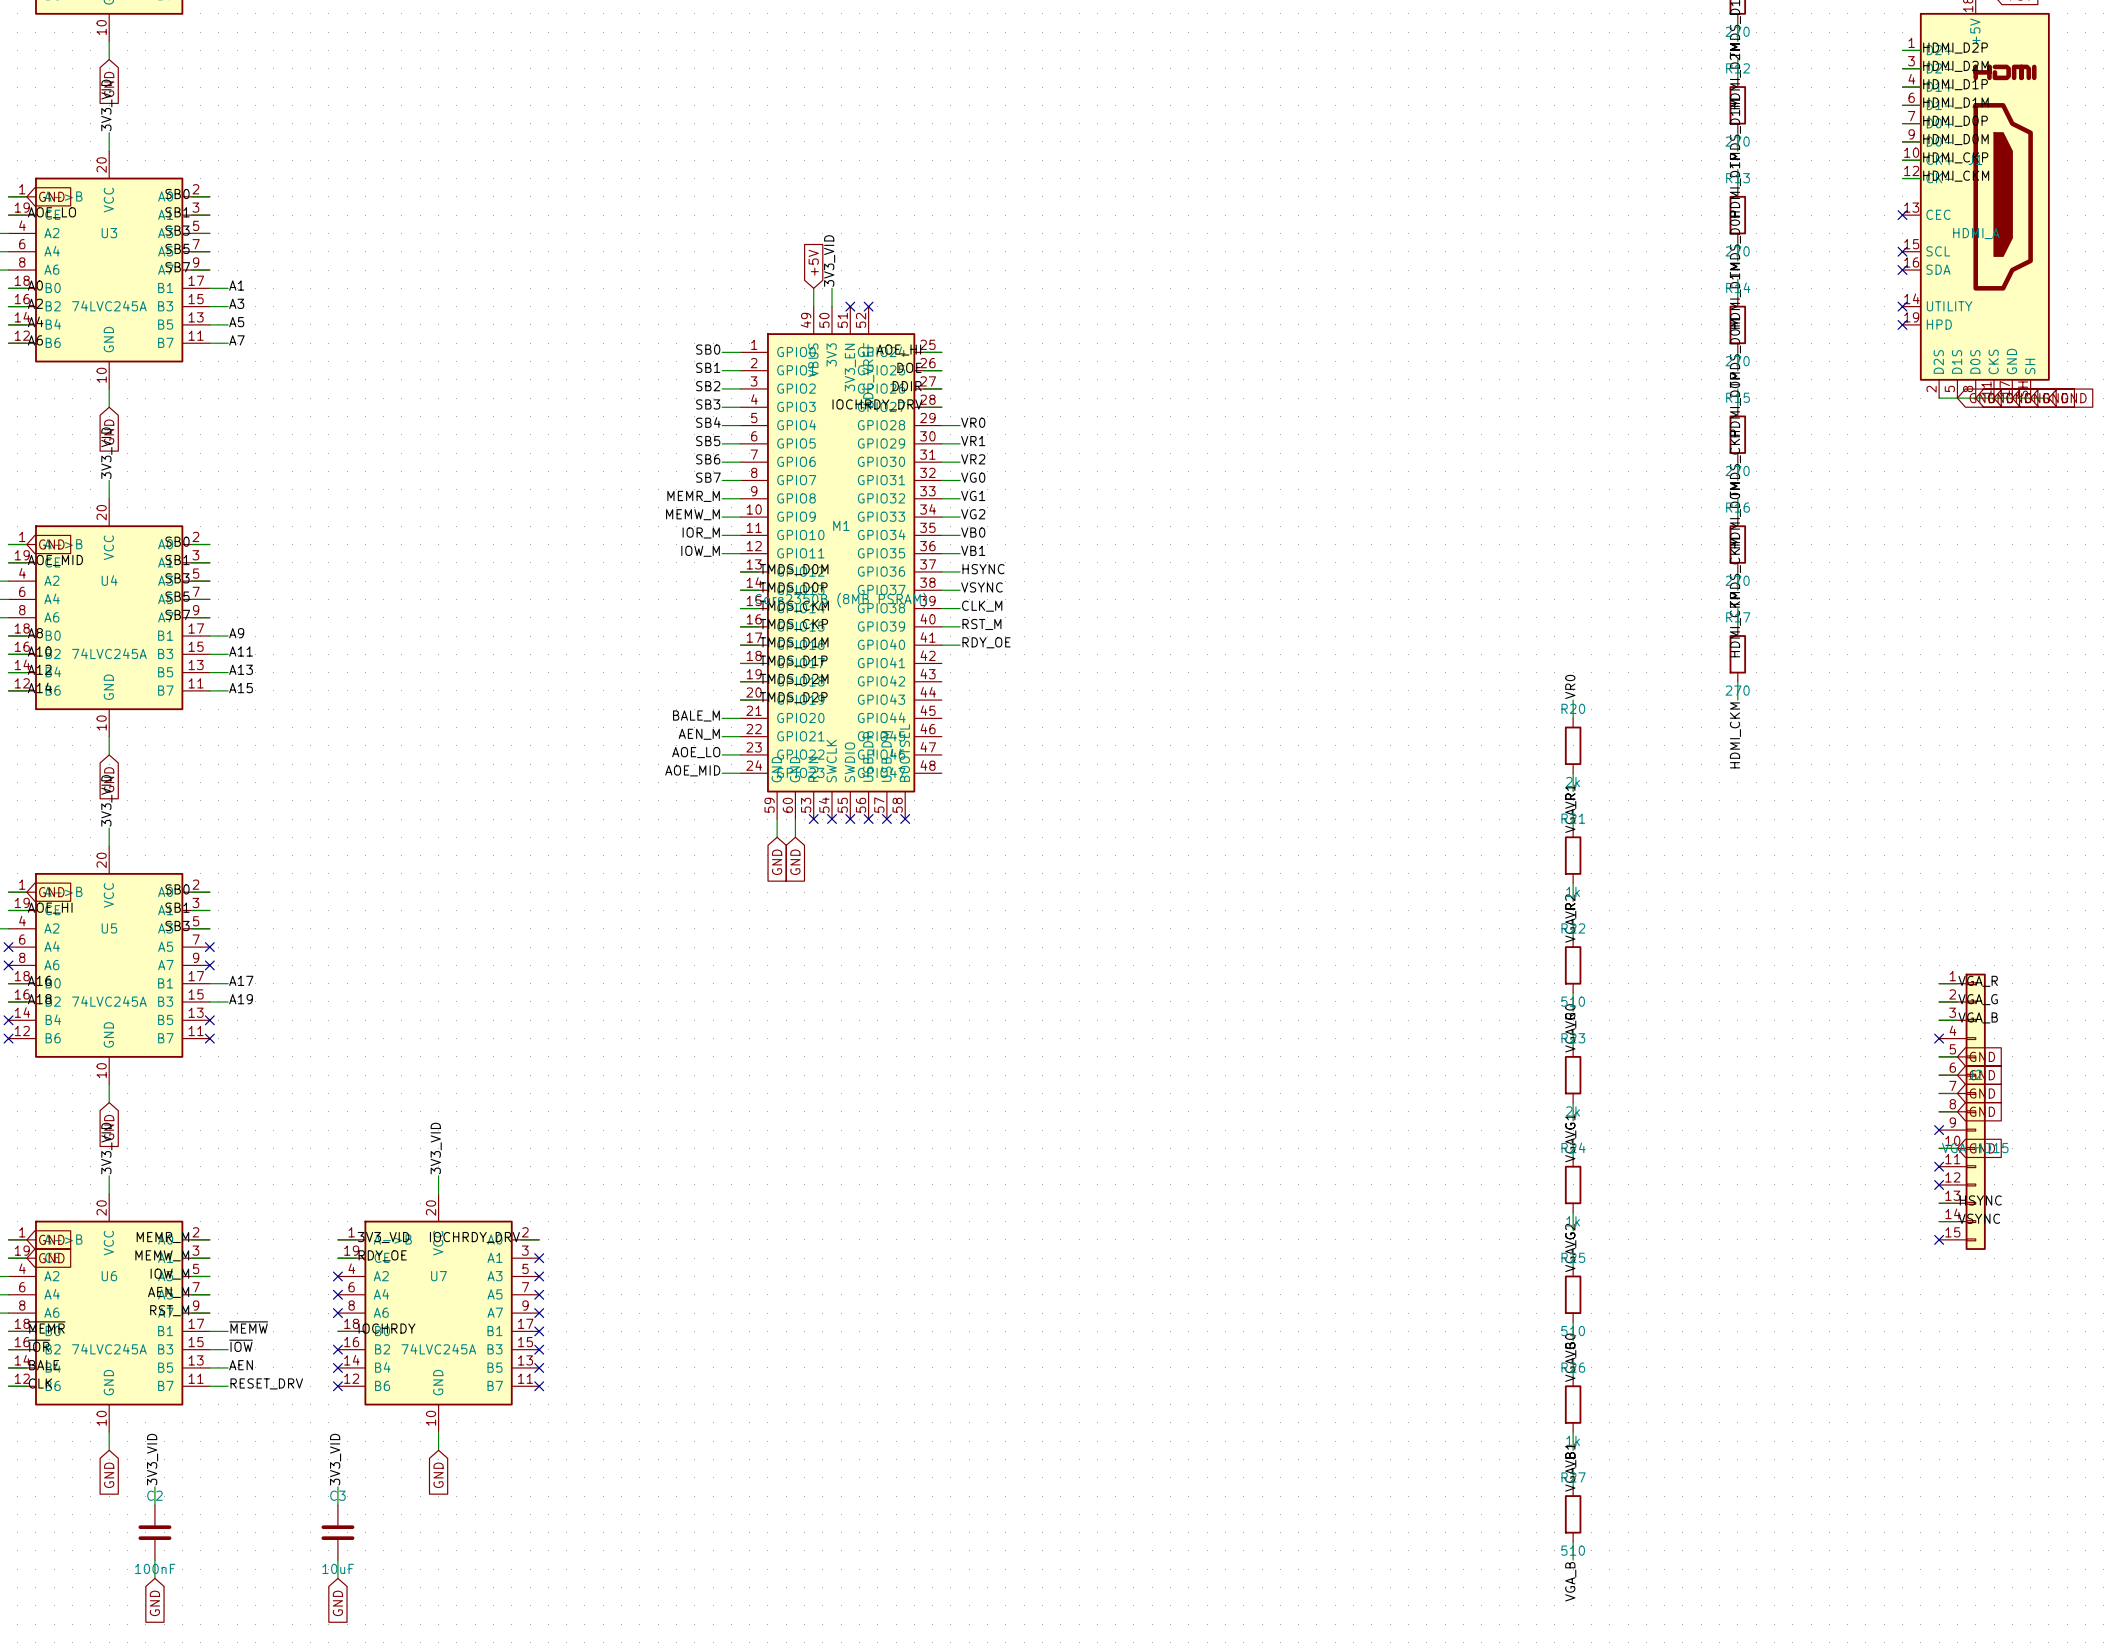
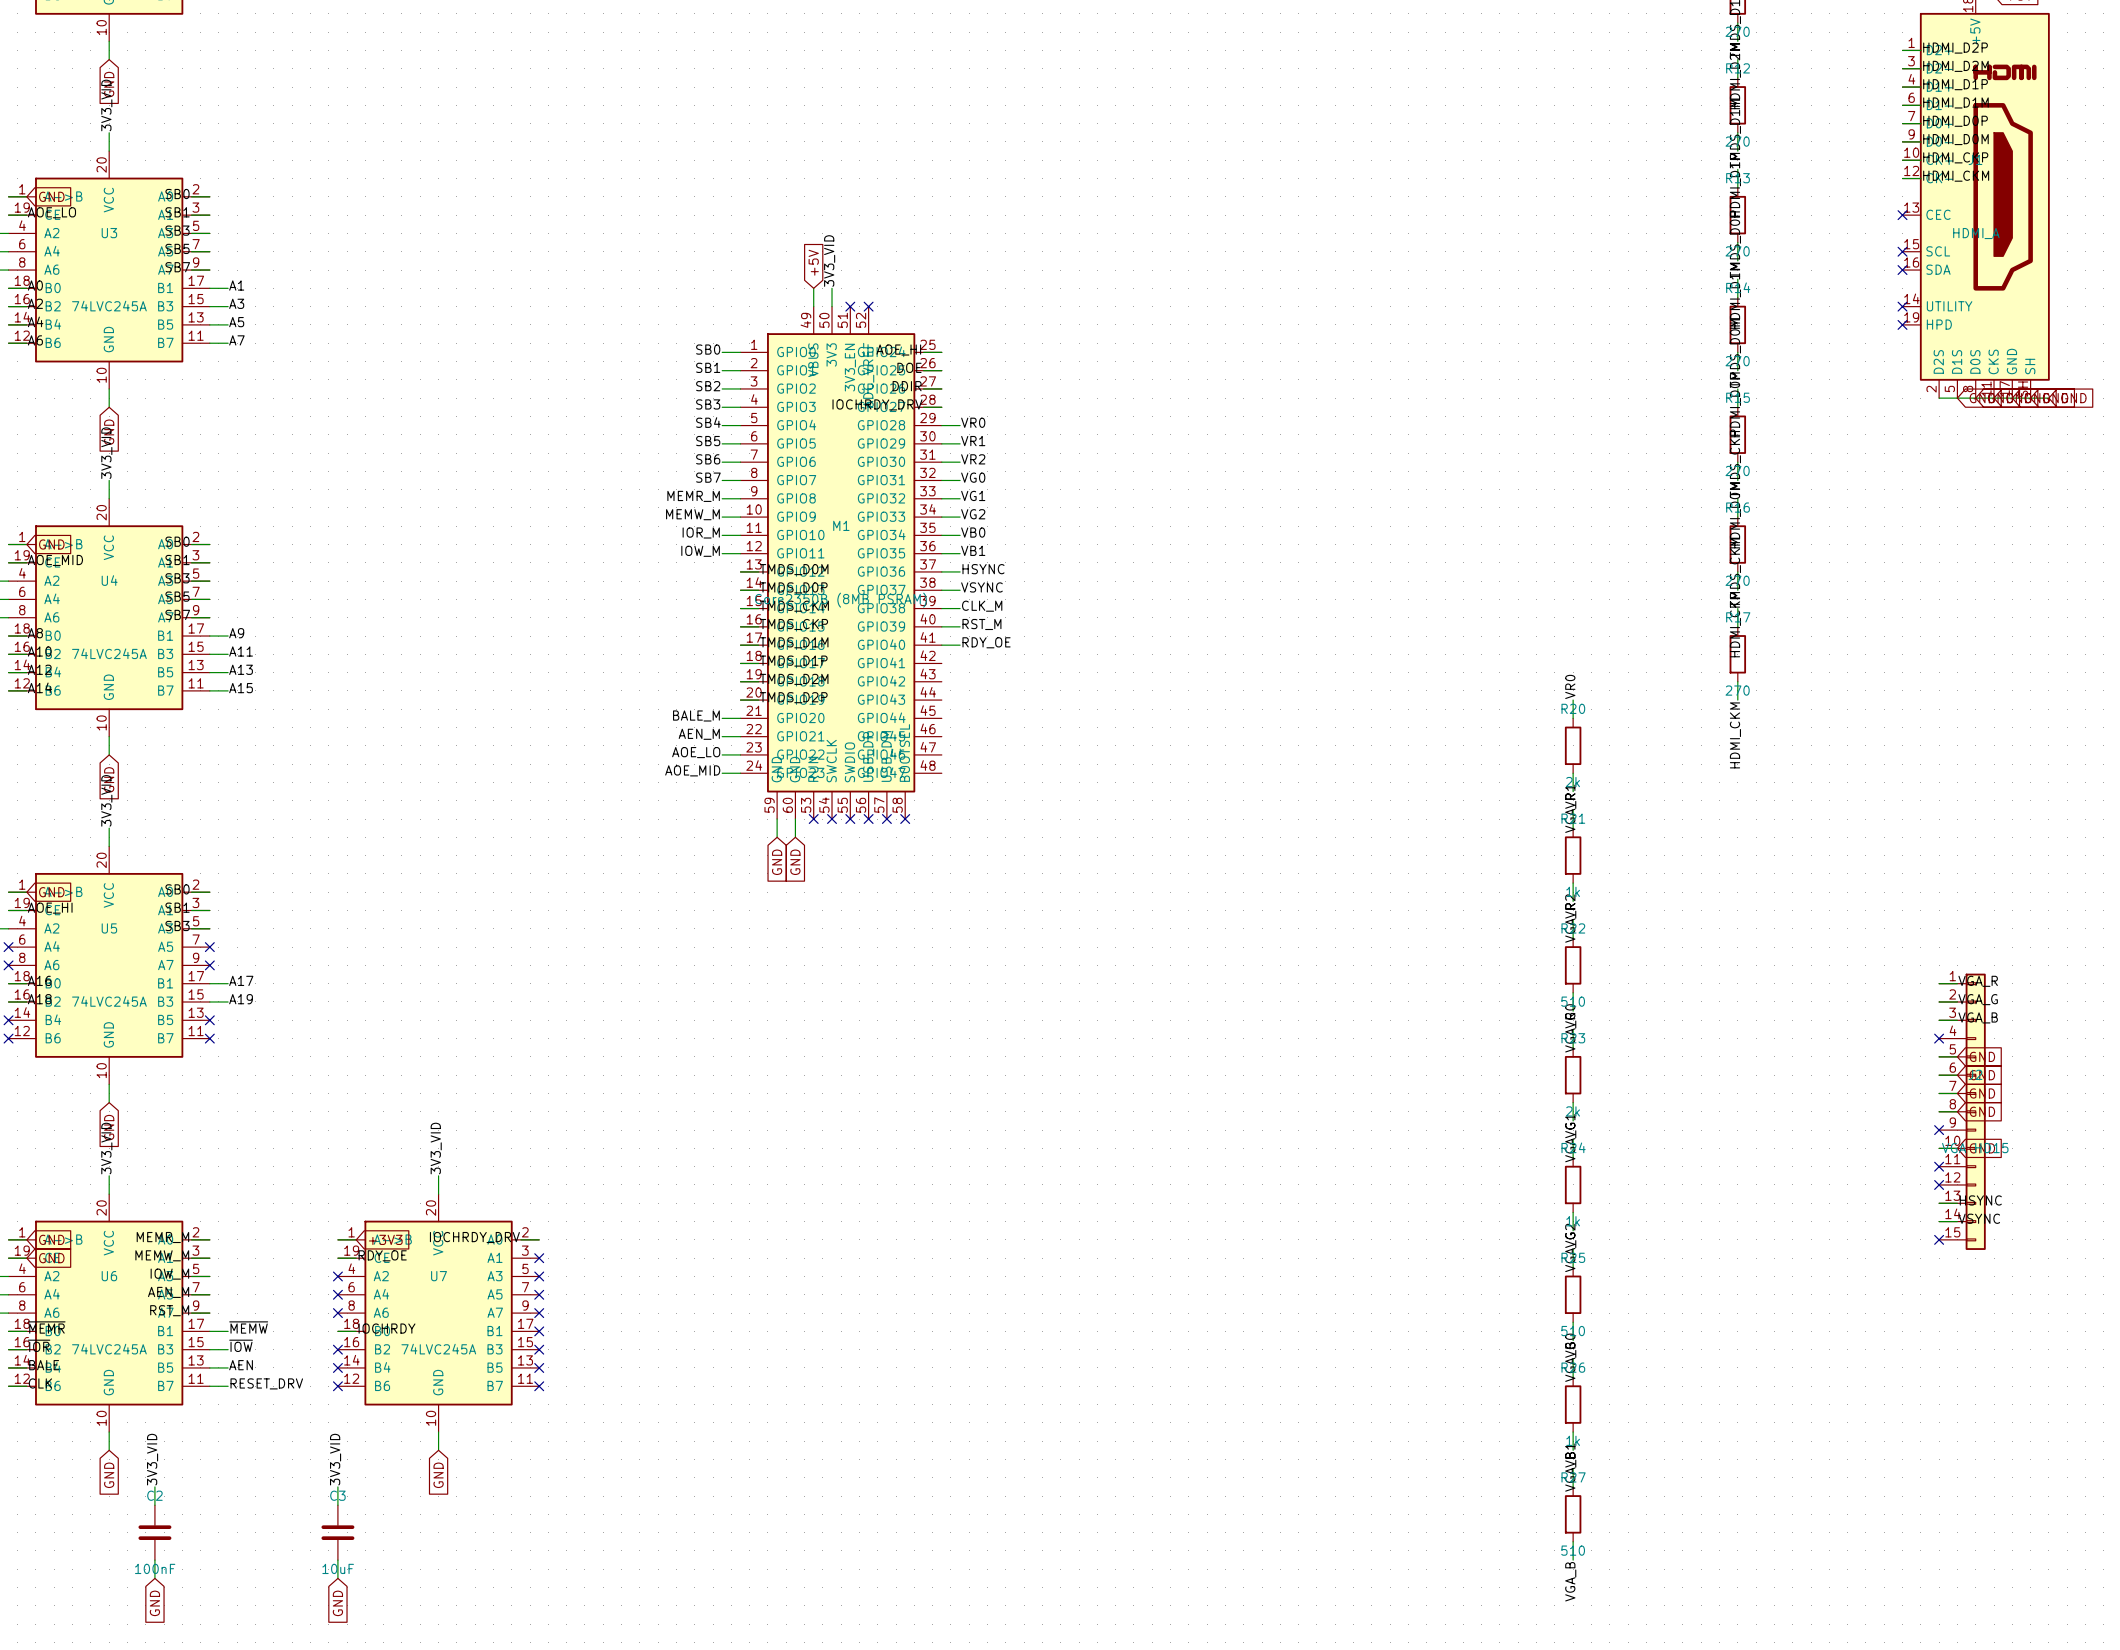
label: 3V3_VID (383, 1237) -> none
global label: none -> +3V3 (385, 1239)

